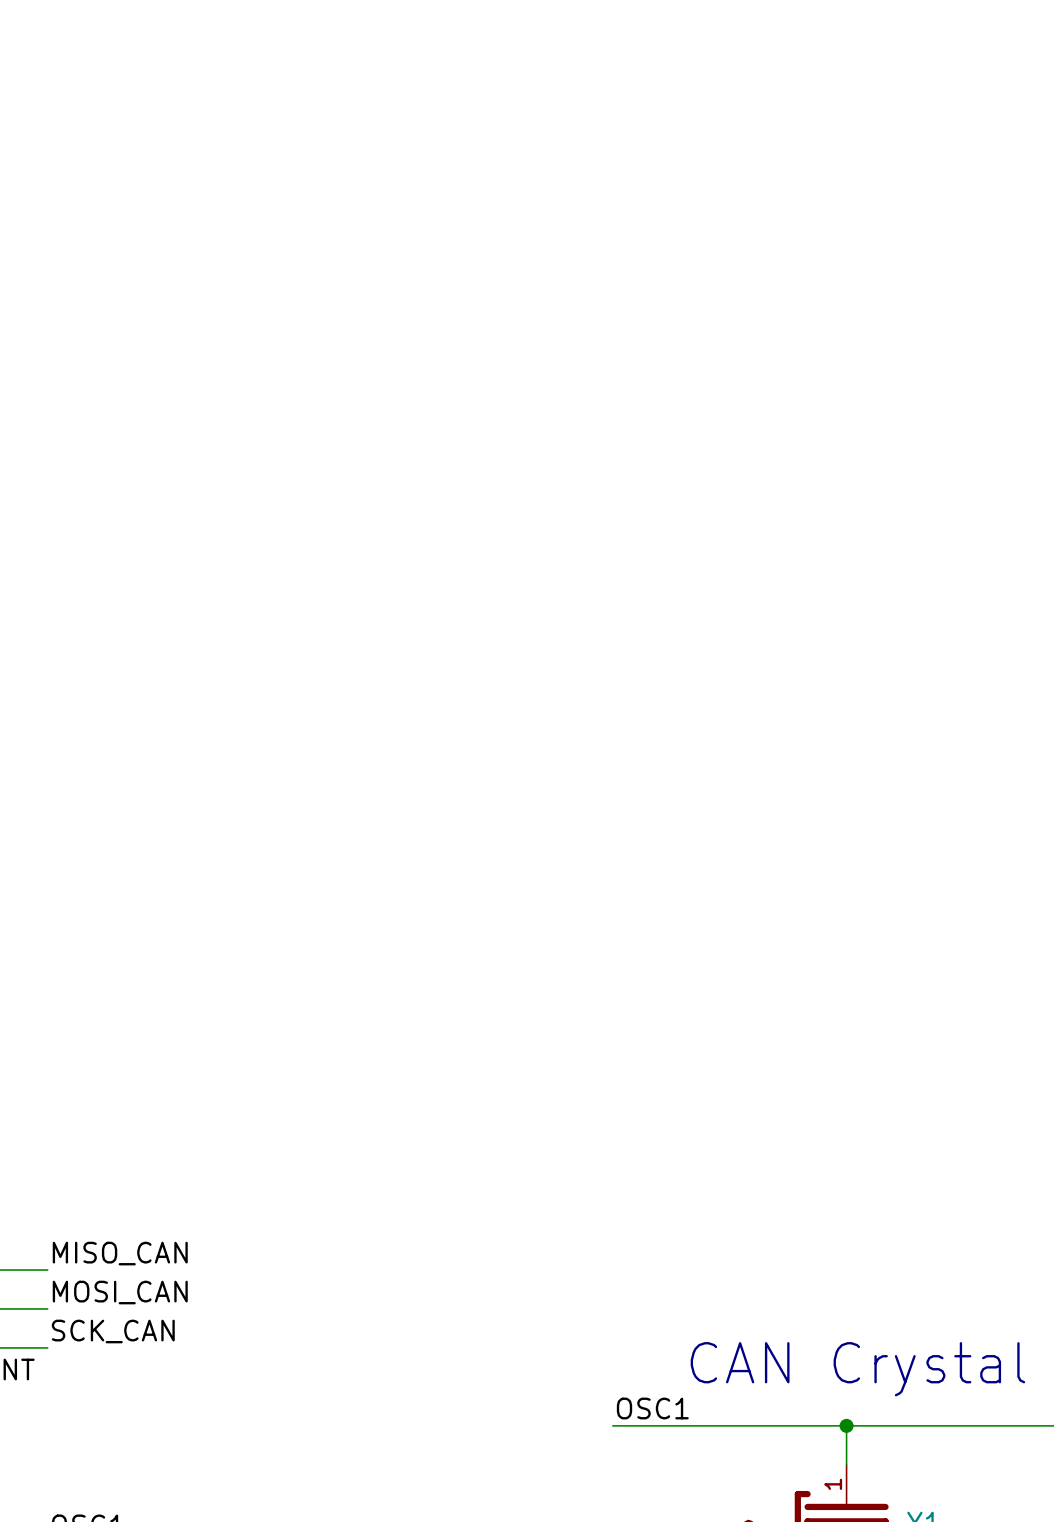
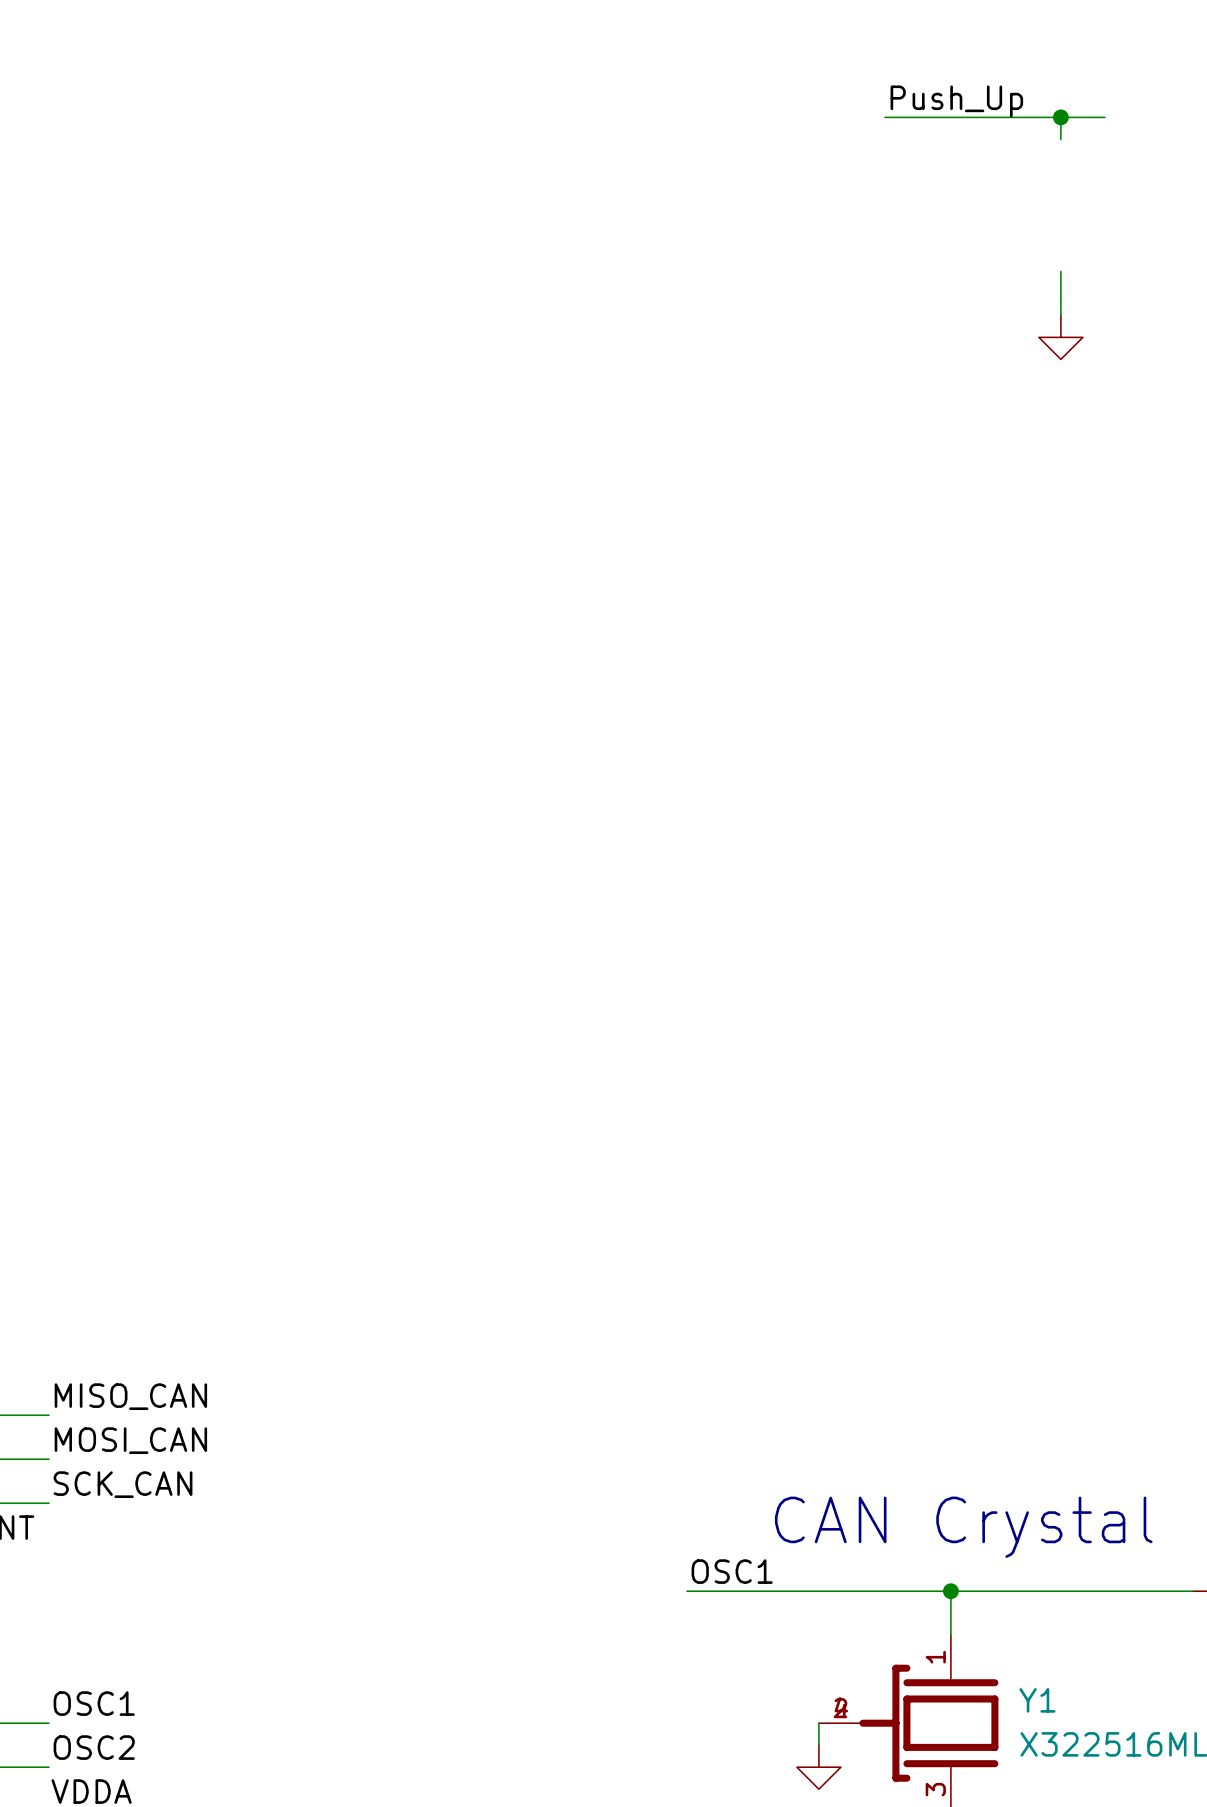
label: none -> Push_Up (956, 101)
wire: none -> (884, 117) (1104, 117)
wire: none -> (1060, 117) (1060, 139)
junction: none -> (1060, 117)
wire: none -> (1060, 271) (1060, 315)
power symbol: none -> (1060, 337)

